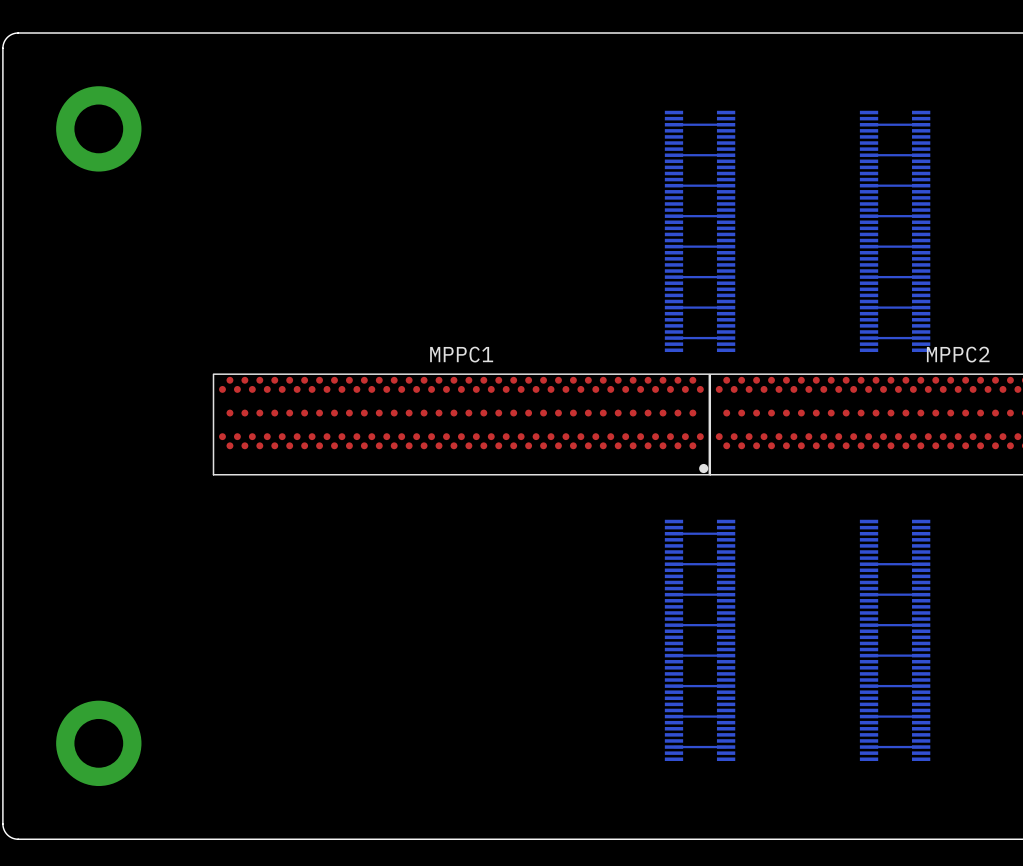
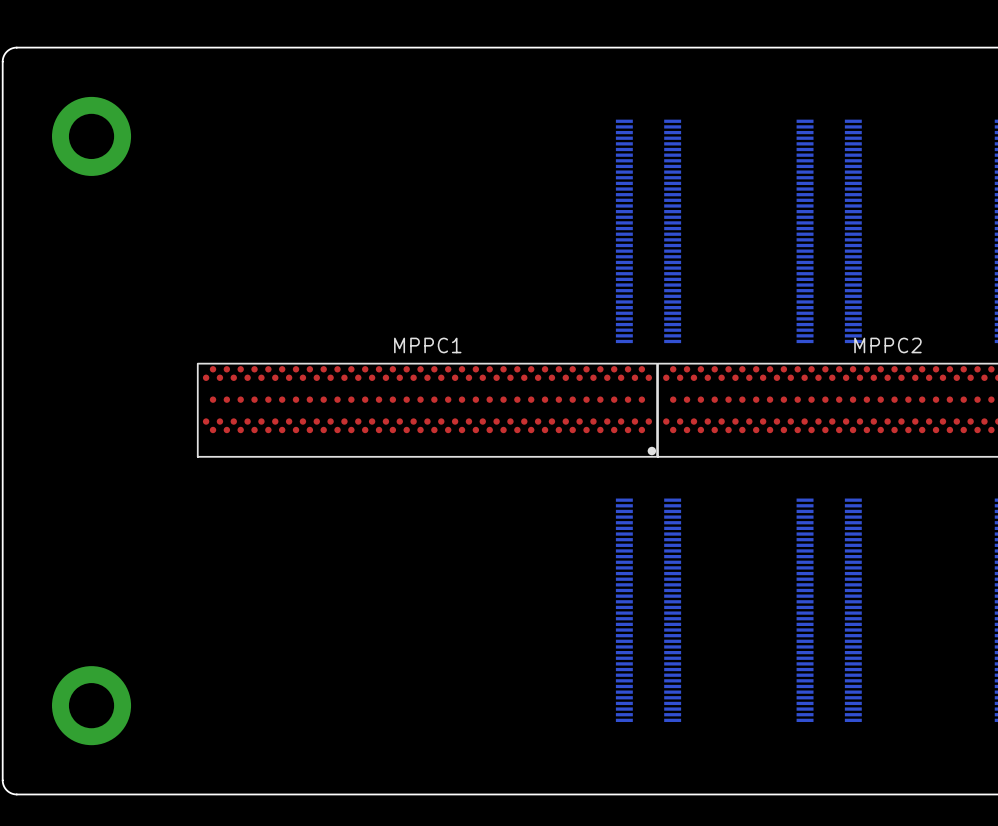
bottom track: (673, 124) (726, 124) -> none
bottom track: (869, 124) (921, 124) -> none
bottom track: (673, 155) (726, 155) -> none
bottom track: (869, 155) (921, 155) -> none
bottom track: (673, 185) (726, 185) -> none
bottom track: (869, 185) (921, 185) -> none
bottom track: (673, 216) (726, 216) -> none
bottom track: (869, 216) (921, 216) -> none
bottom track: (673, 246) (726, 246) -> none
bottom track: (869, 246) (921, 246) -> none
bottom track: (673, 277) (726, 277) -> none
bottom track: (869, 277) (921, 277) -> none
bottom track: (673, 307) (726, 307) -> none
bottom track: (869, 307) (921, 307) -> none
bottom track: (673, 338) (726, 338) -> none
bottom track: (869, 338) (921, 338) -> none
bottom track: (673, 533) (726, 533) -> none
bottom track: (673, 564) (726, 564) -> none
bottom track: (869, 564) (921, 564) -> none
bottom track: (673, 594) (726, 594) -> none
bottom track: (869, 594) (921, 594) -> none
bottom track: (673, 625) (726, 625) -> none
bottom track: (869, 625) (921, 625) -> none
bottom track: (673, 655) (726, 655) -> none
bottom track: (869, 655) (921, 655) -> none
bottom track: (673, 686) (726, 686) -> none
bottom track: (869, 686) (921, 686) -> none
bottom track: (673, 716) (726, 716) -> none
bottom track: (869, 716) (921, 716) -> none
bottom track: (673, 747) (726, 747) -> none
bottom track: (869, 747) (921, 747) -> none

